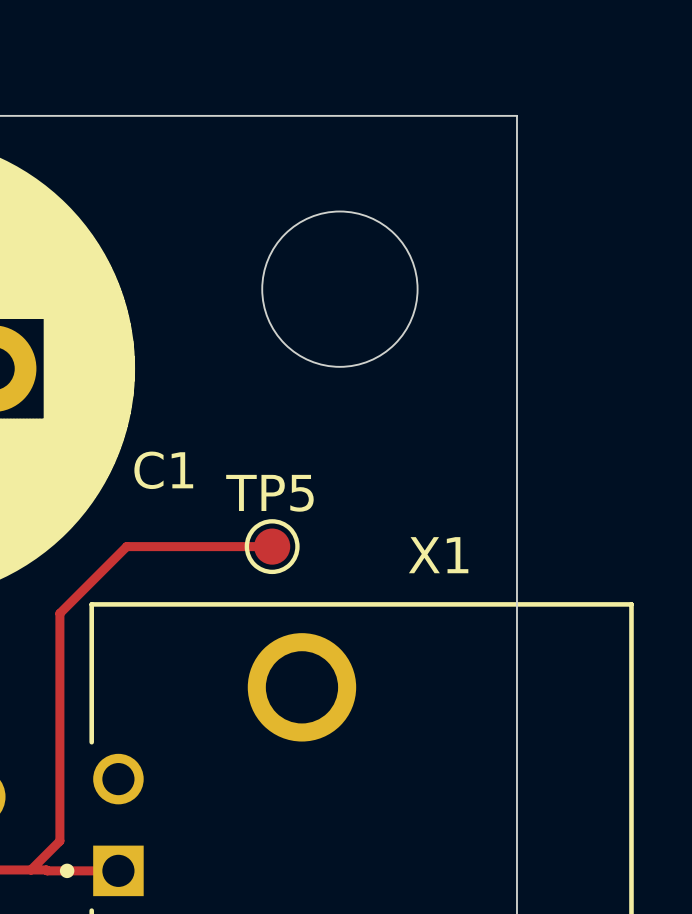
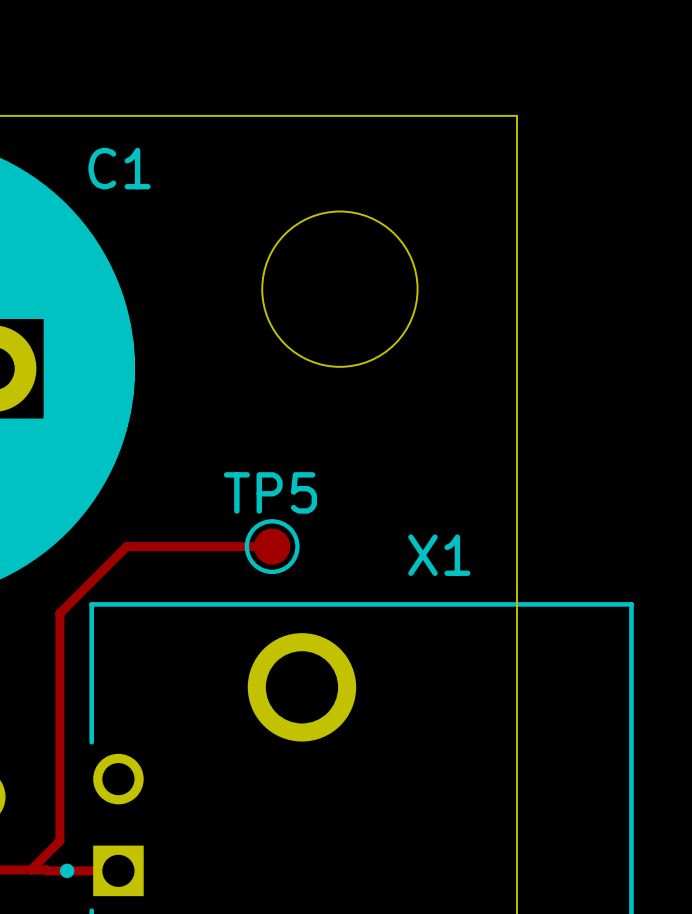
C1 name position: C1 (163, 470) -> C1 (119, 168)

